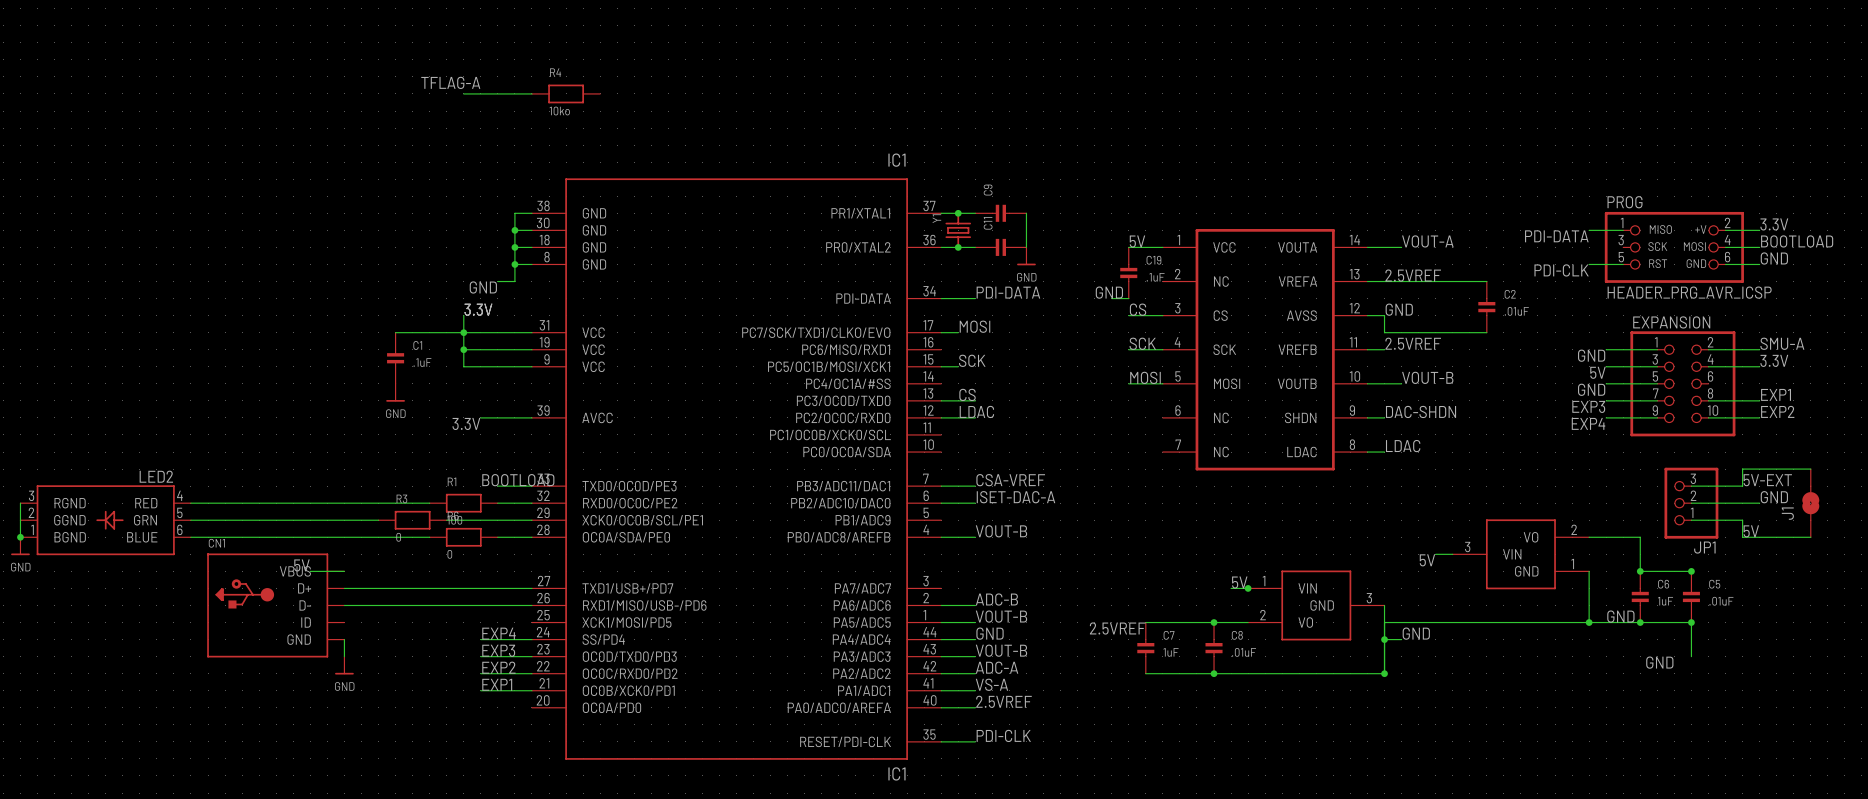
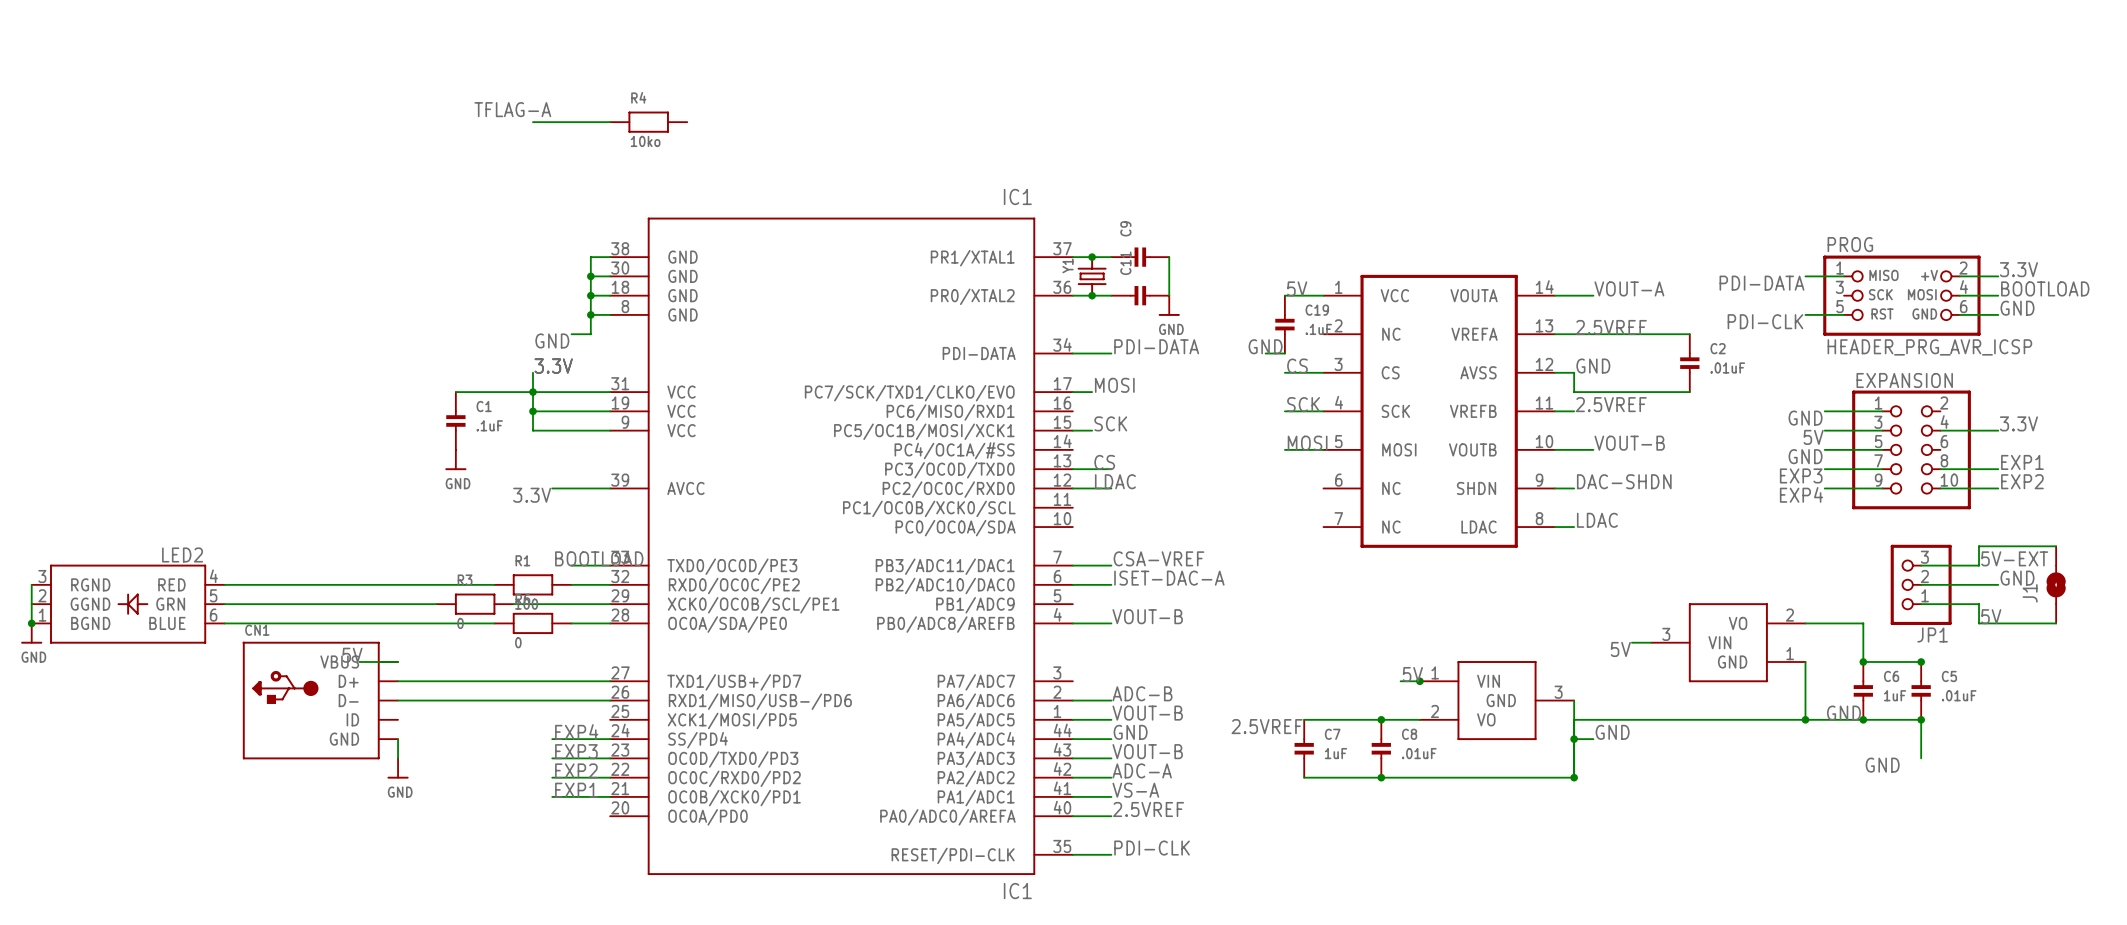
label: SMU-A (1782, 343) -> none
wire: (1708, 349) (1759, 349) -> none

